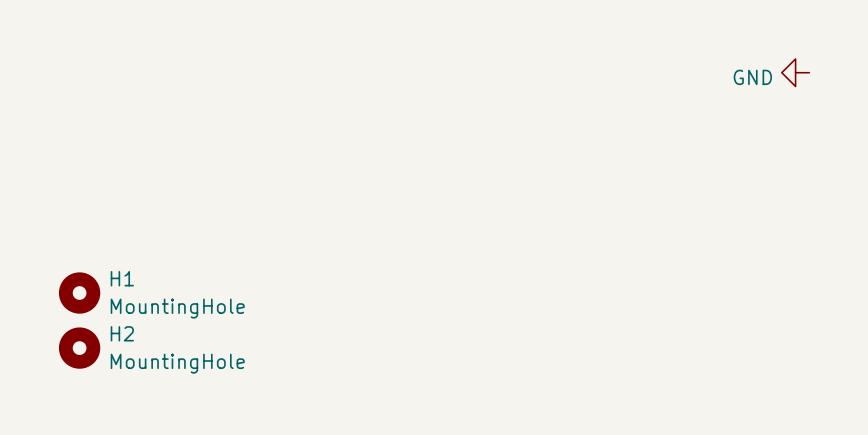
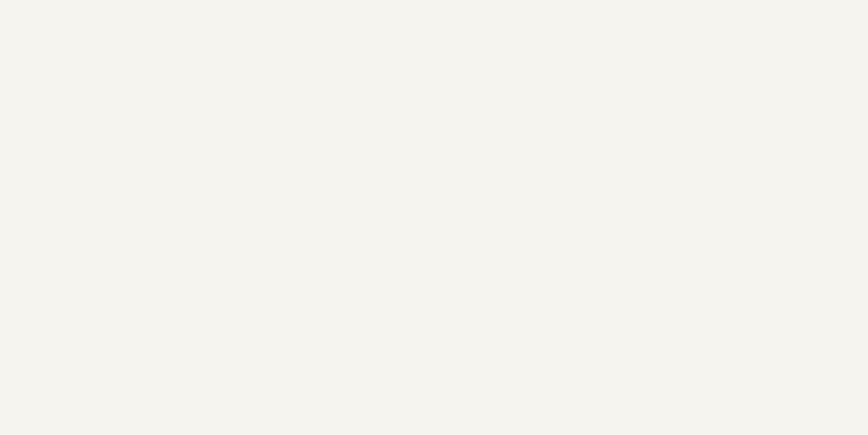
power symbol: GND (795, 72) -> none
H1: MountingHole (79, 293) -> none
H2: MountingHole (79, 348) -> none

